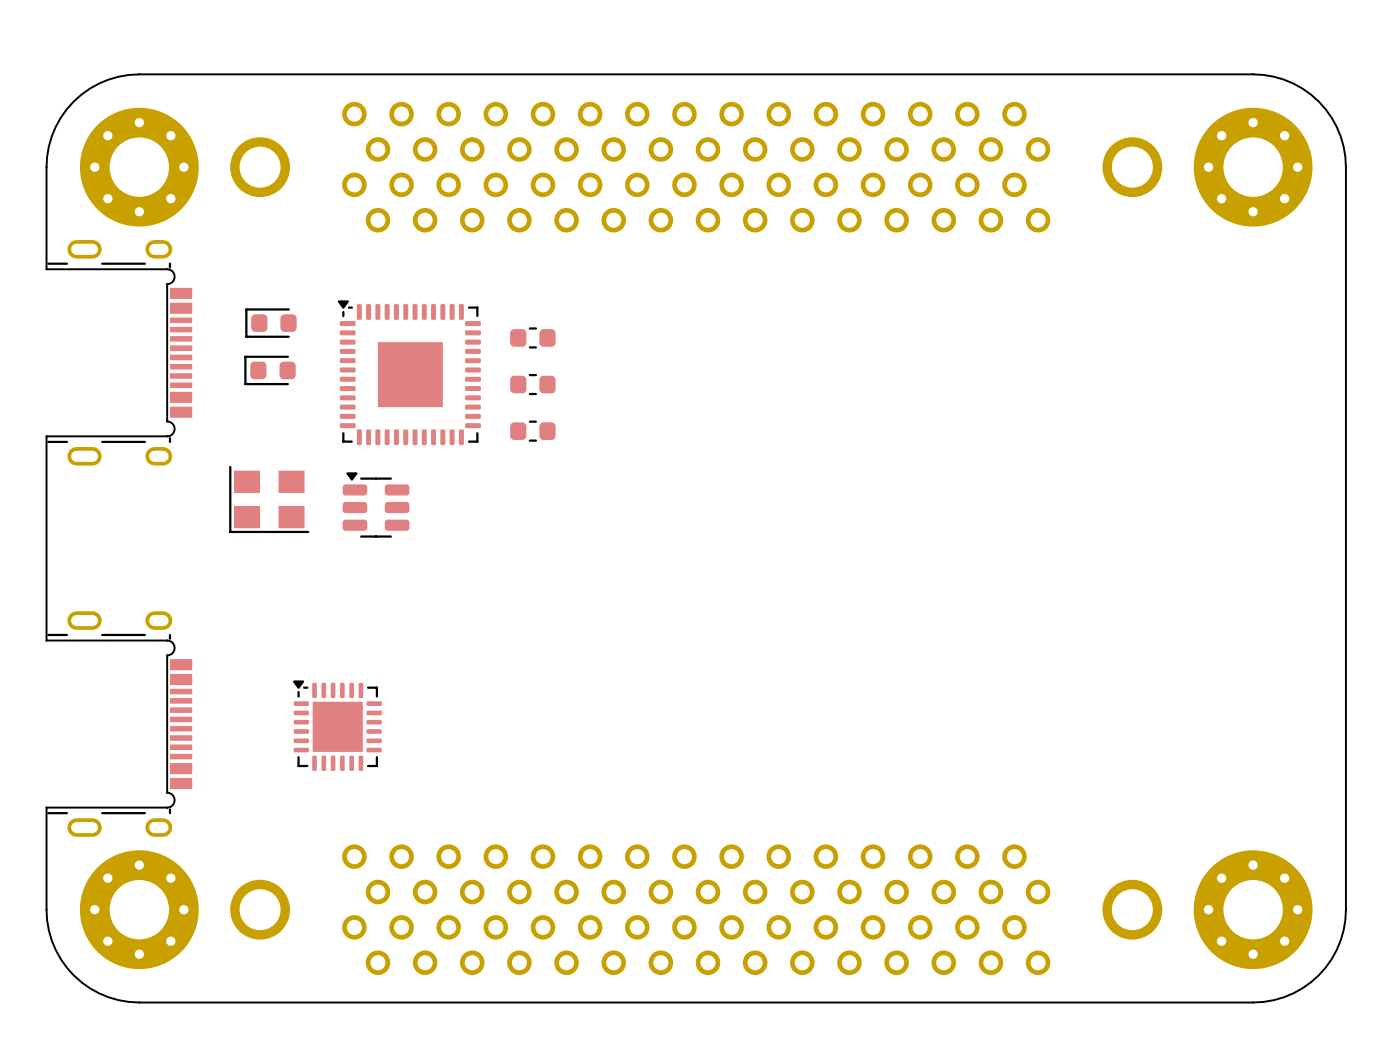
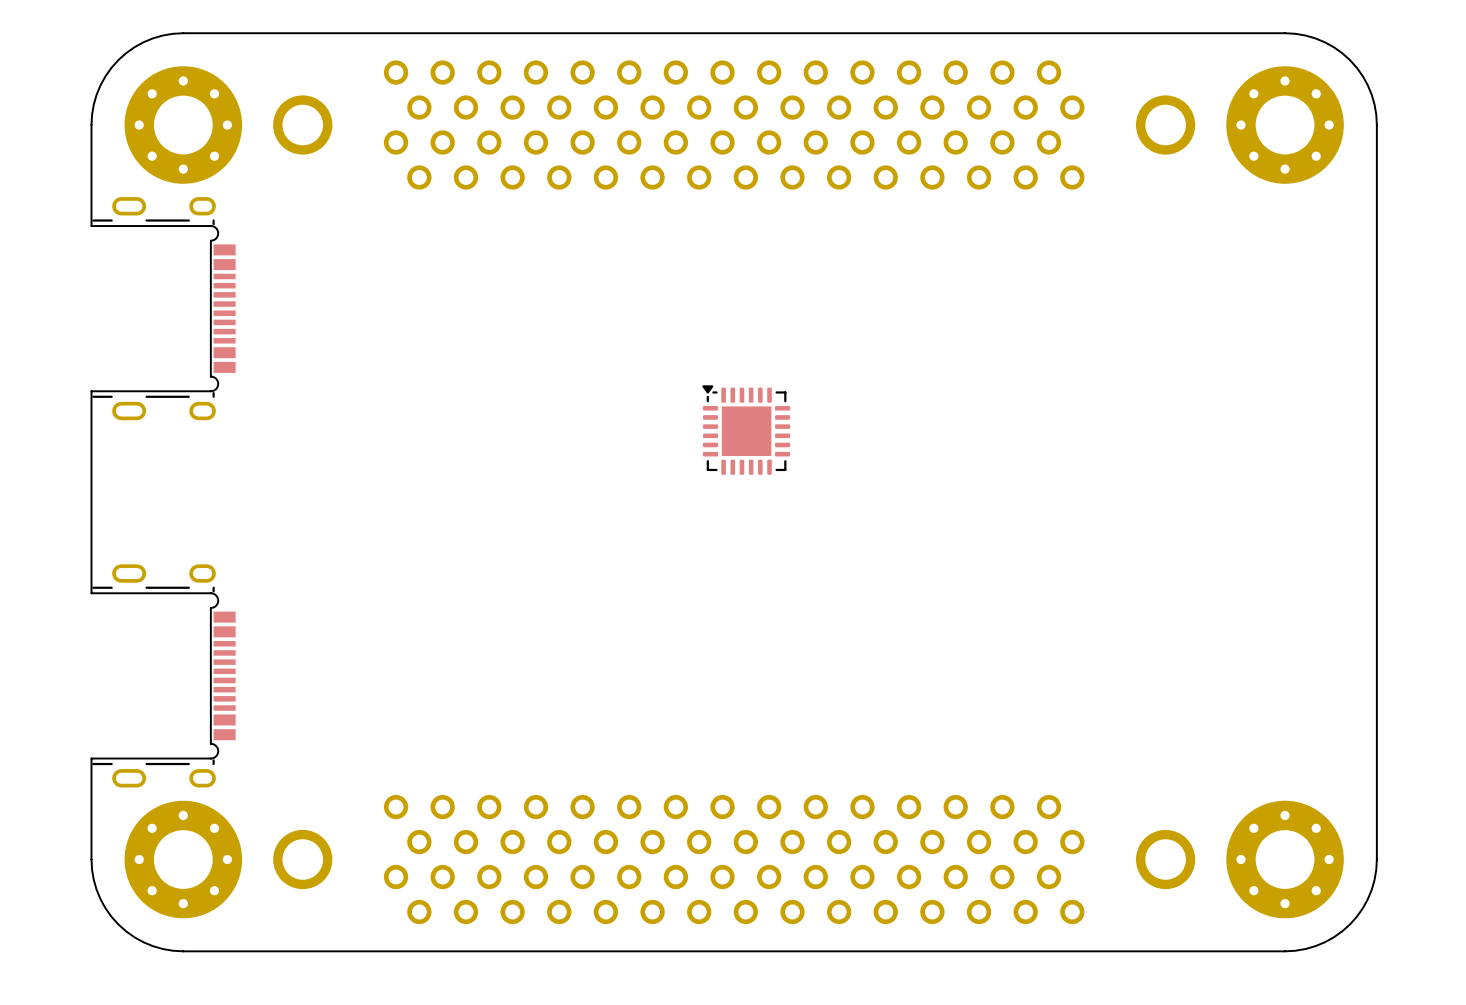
part: (270, 323) -> none
part: (532, 337) -> none
part: (270, 370) -> none
part: (409, 372) -> none
part: (532, 384) -> none
part: (532, 431) -> none
part: (269, 499) -> none
part: (376, 504) -> none
part position: (337, 725) -> (746, 430)

